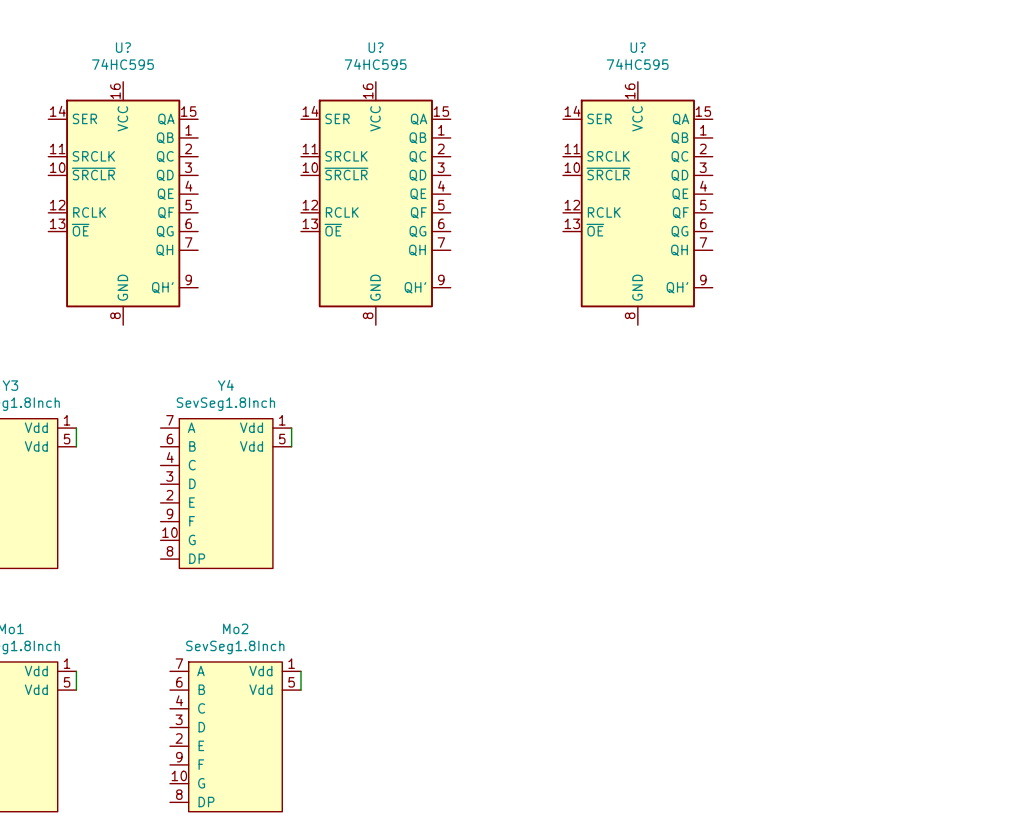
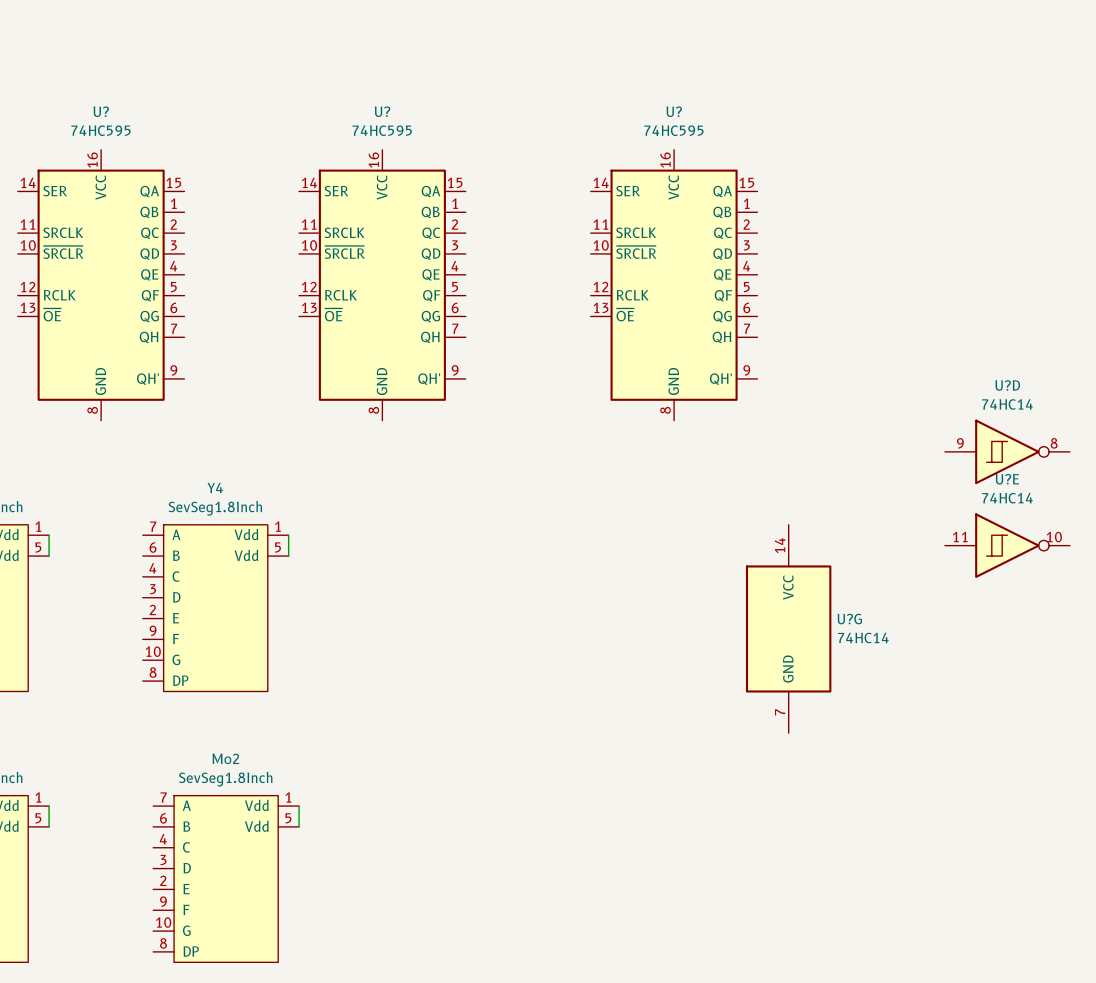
U?D: none -> 74HC14 (1007, 451)
U?E: none -> 74HC14 (1007, 545)
U?G: none -> 74HC14 (788, 628)

